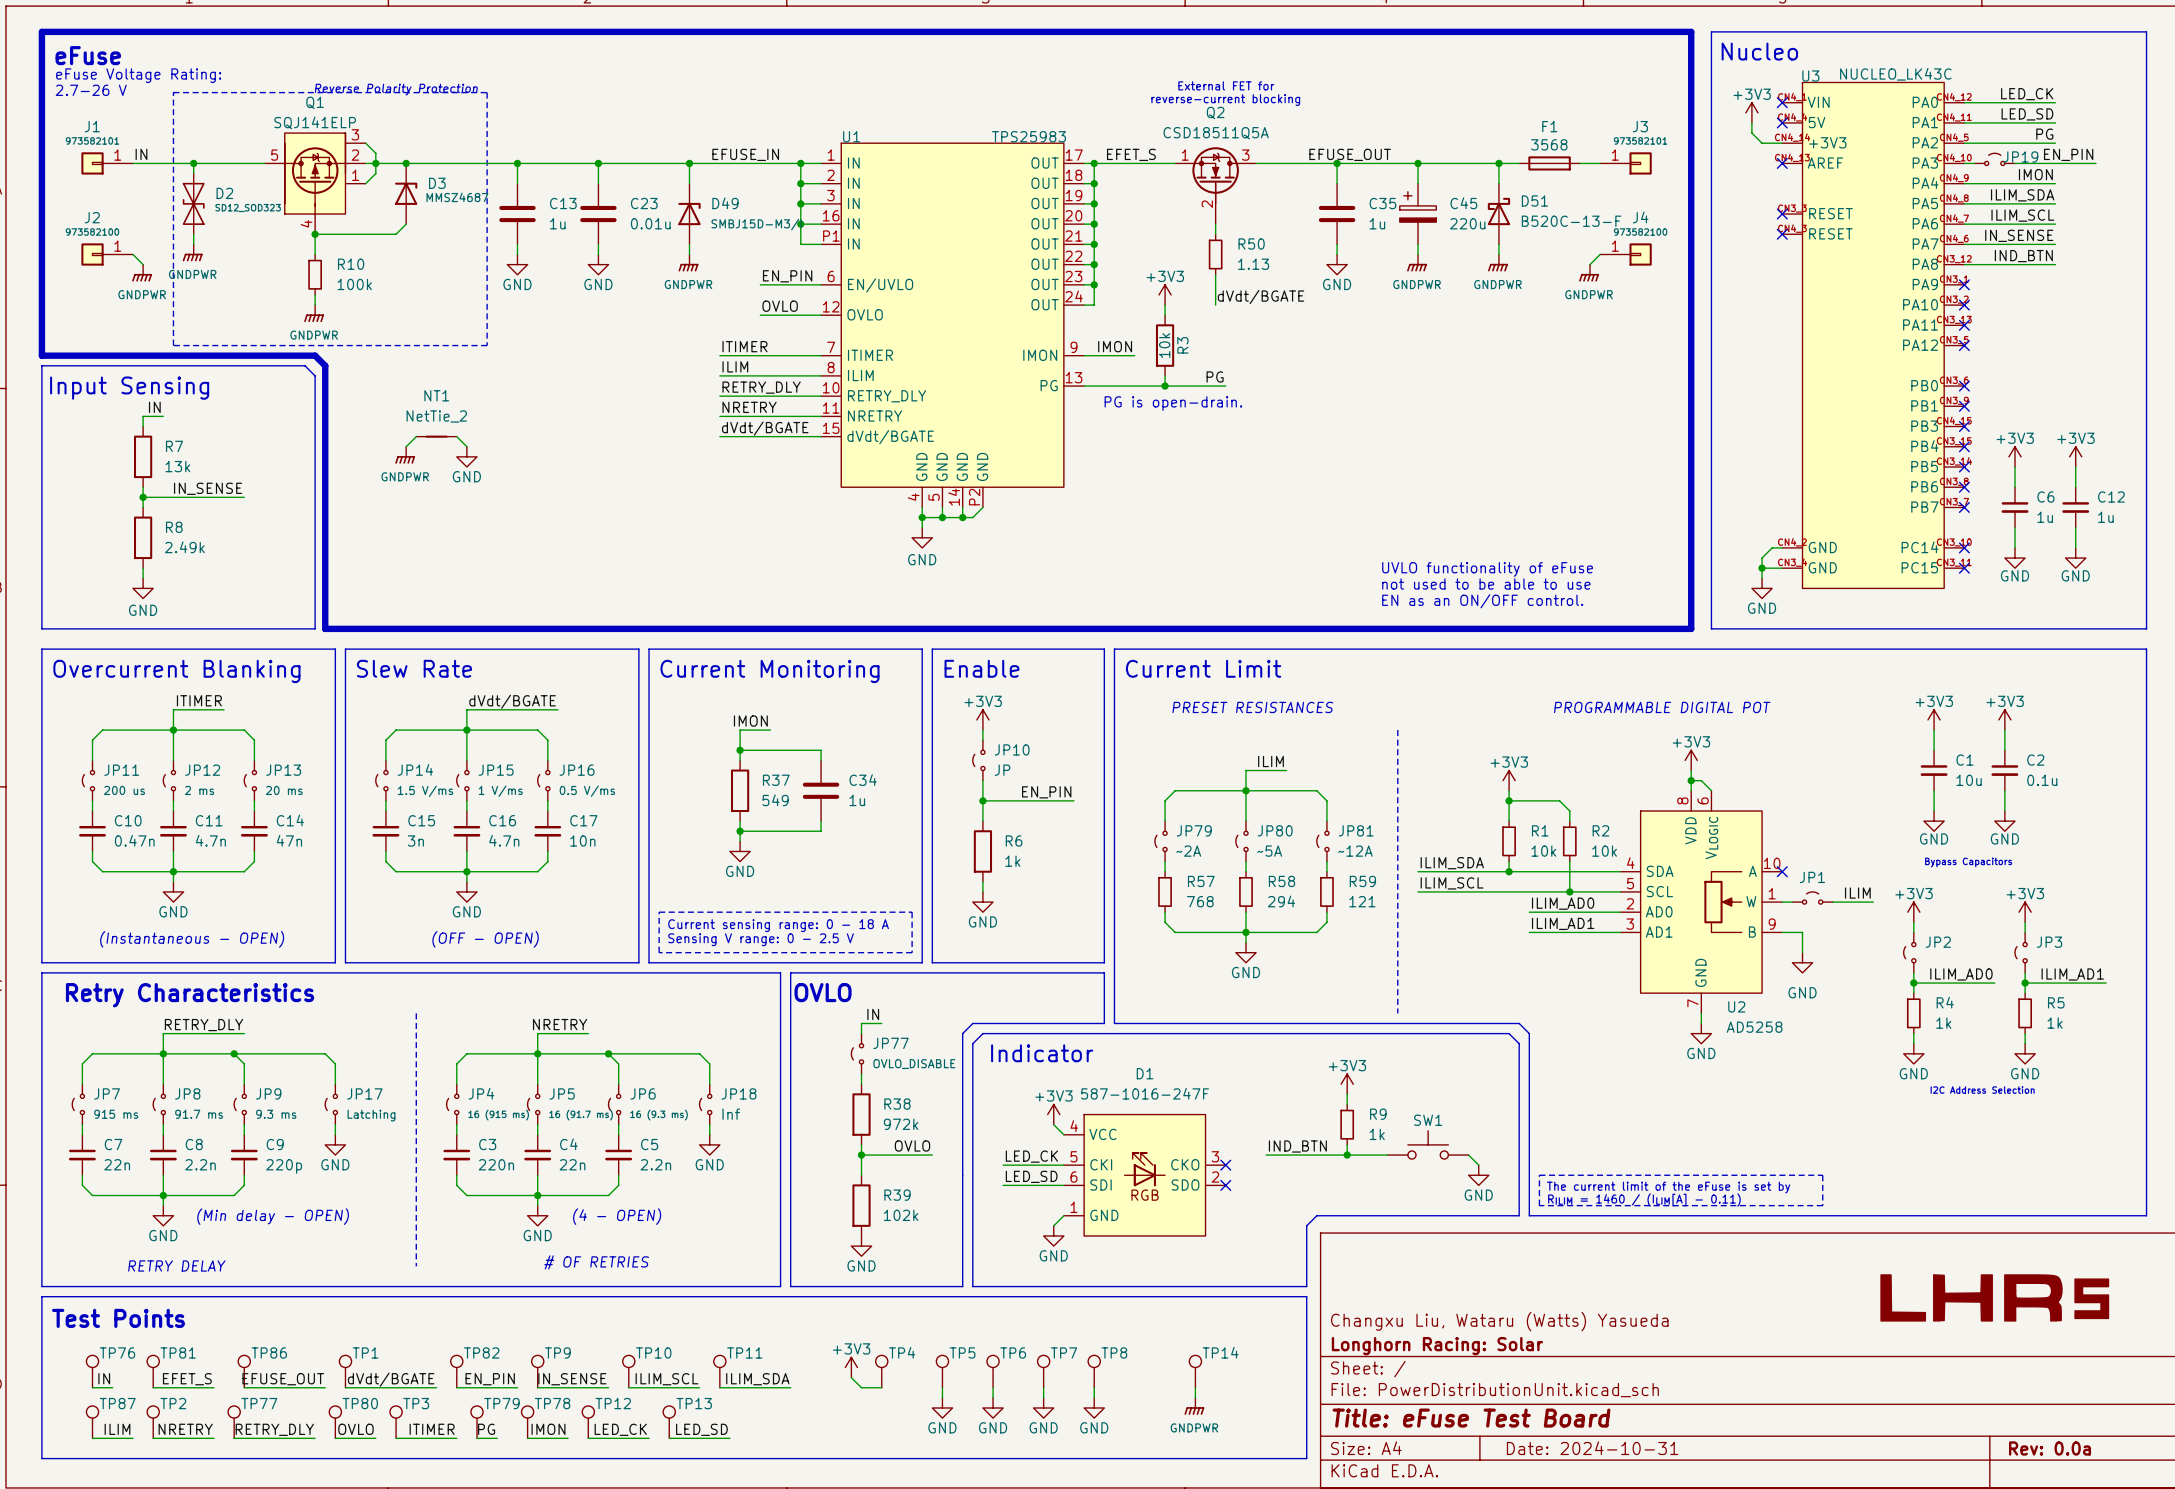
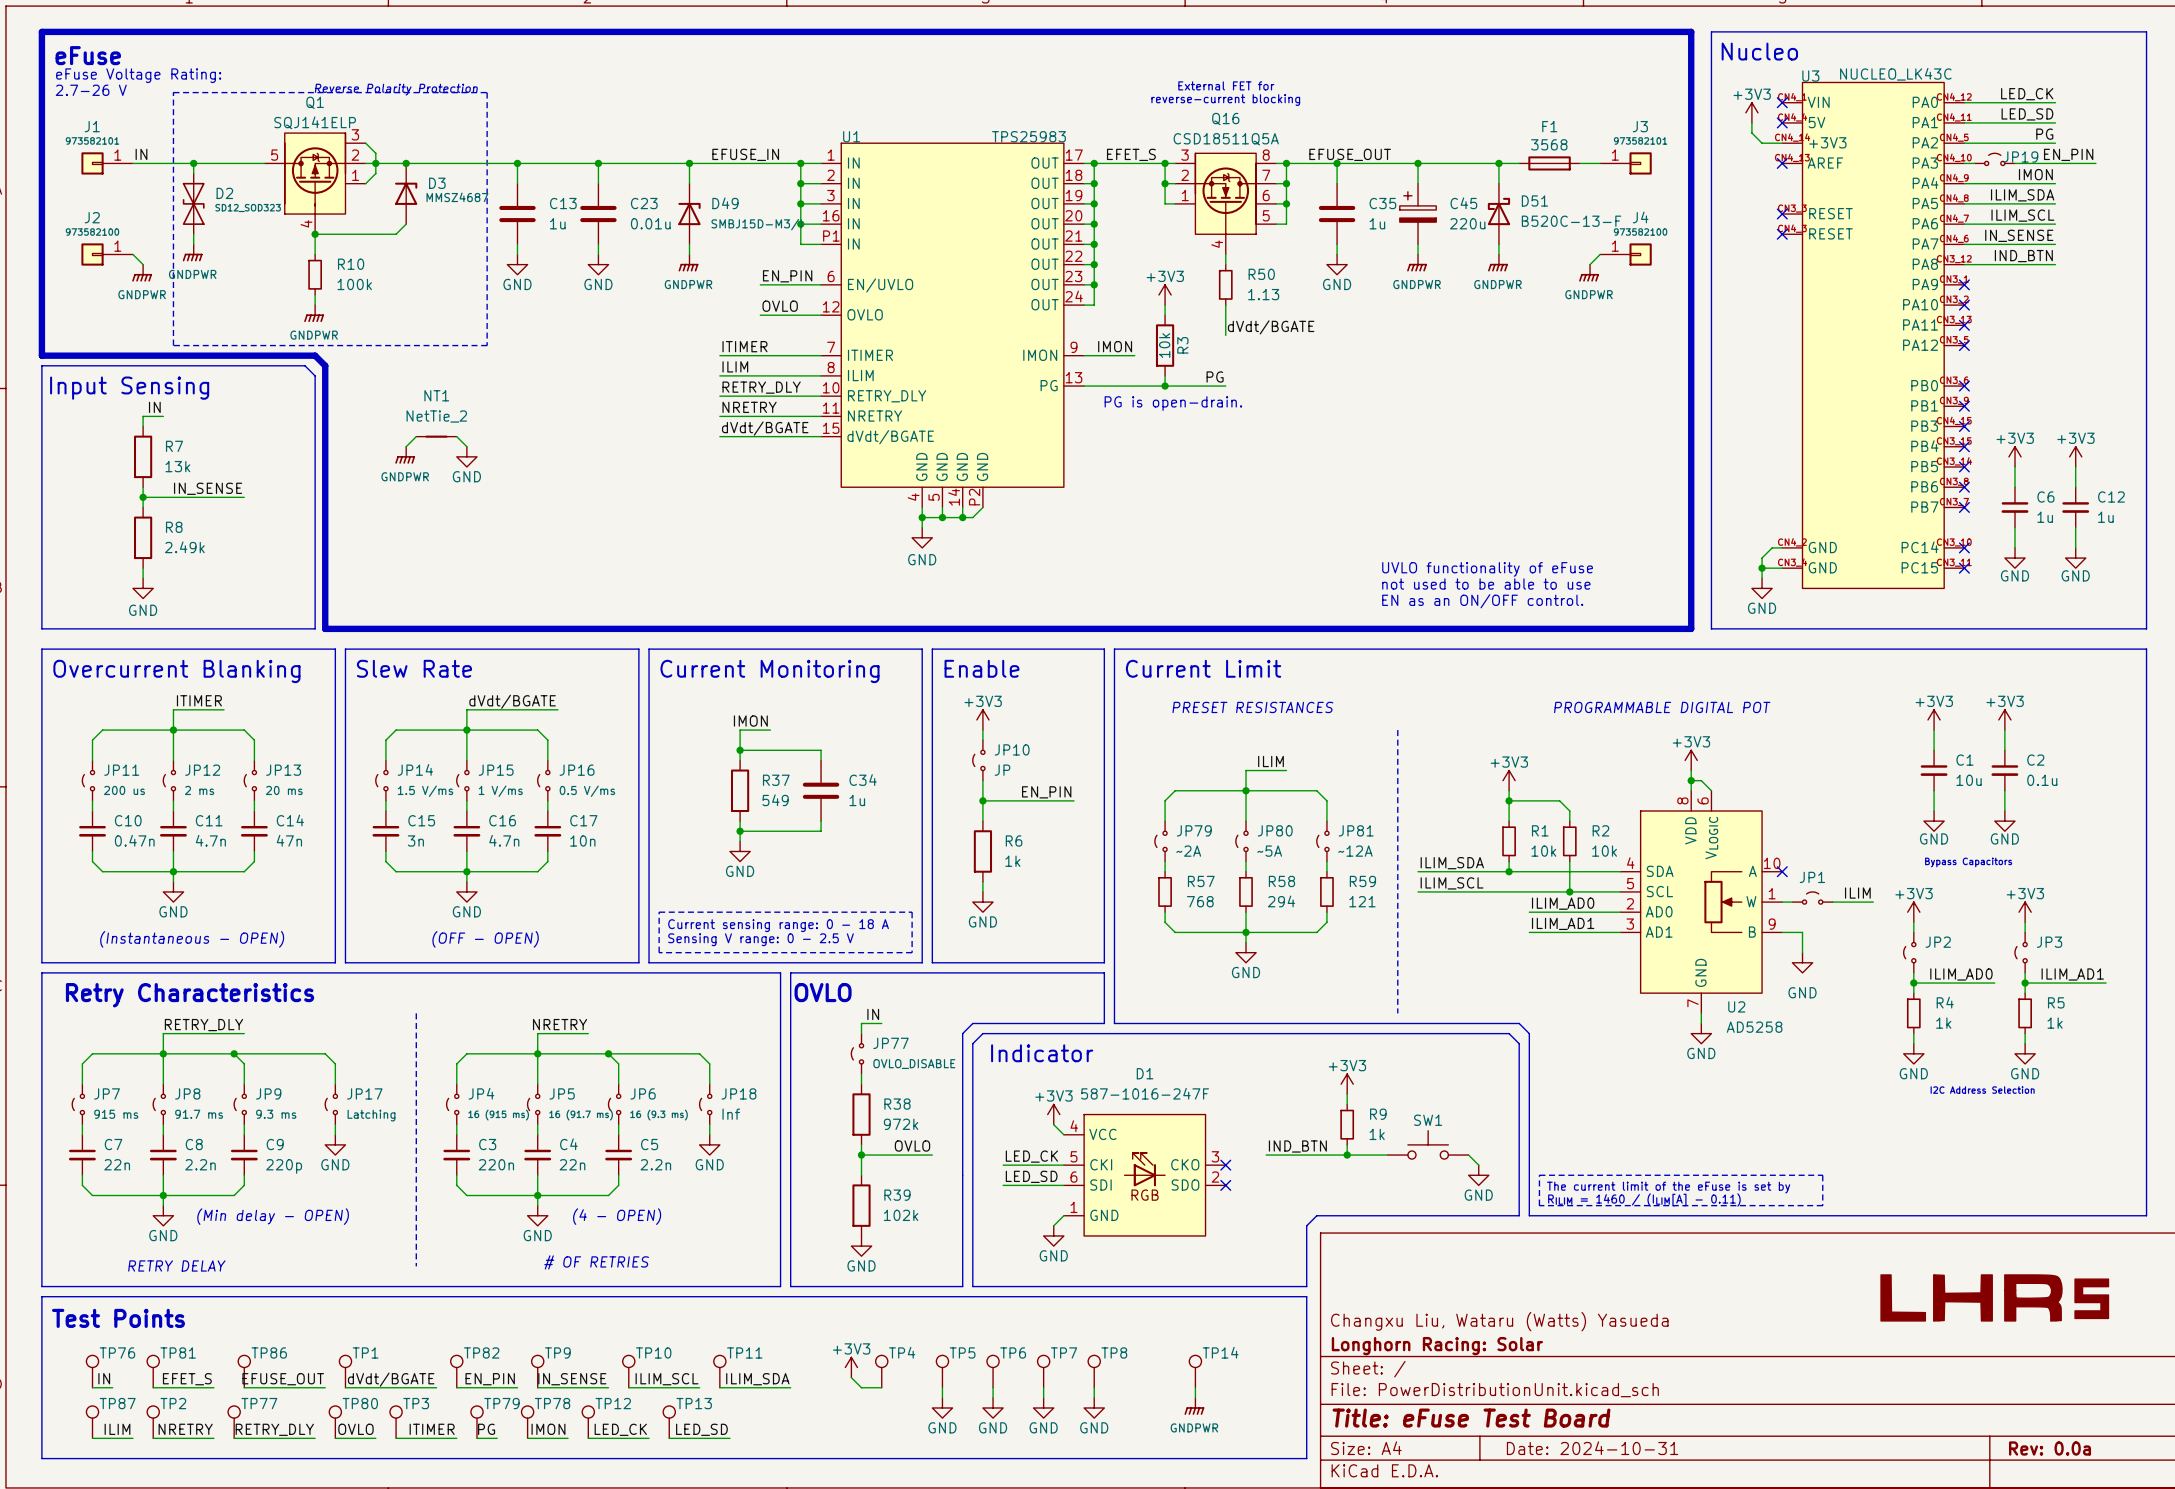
wire: none -> (1165, 163) (1165, 203) (1175, 203)
junction: none -> (1165, 163)
wire: none -> (1286, 163) (1286, 224) (1276, 224)
junction: none -> (1286, 163)
wire: none -> (1165, 183) (1175, 183)
junction: none -> (1165, 183)
wire: none -> (1276, 183) (1286, 183)
junction: none -> (1286, 183)
Q2: CSD18511Q5A (1215, 185) -> none
Q16: none -> CSD18511Q5A (1225, 203)
wire: none -> (1276, 203) (1286, 203)
junction: none -> (1286, 203)
R50 position: (1215, 254) -> (1225, 284)
wire: (1215, 274) (1215, 305) -> (1225, 305) (1225, 335)
label position: dVdt/BGATE (1261, 297) -> dVdt/BGATE (1271, 327)

